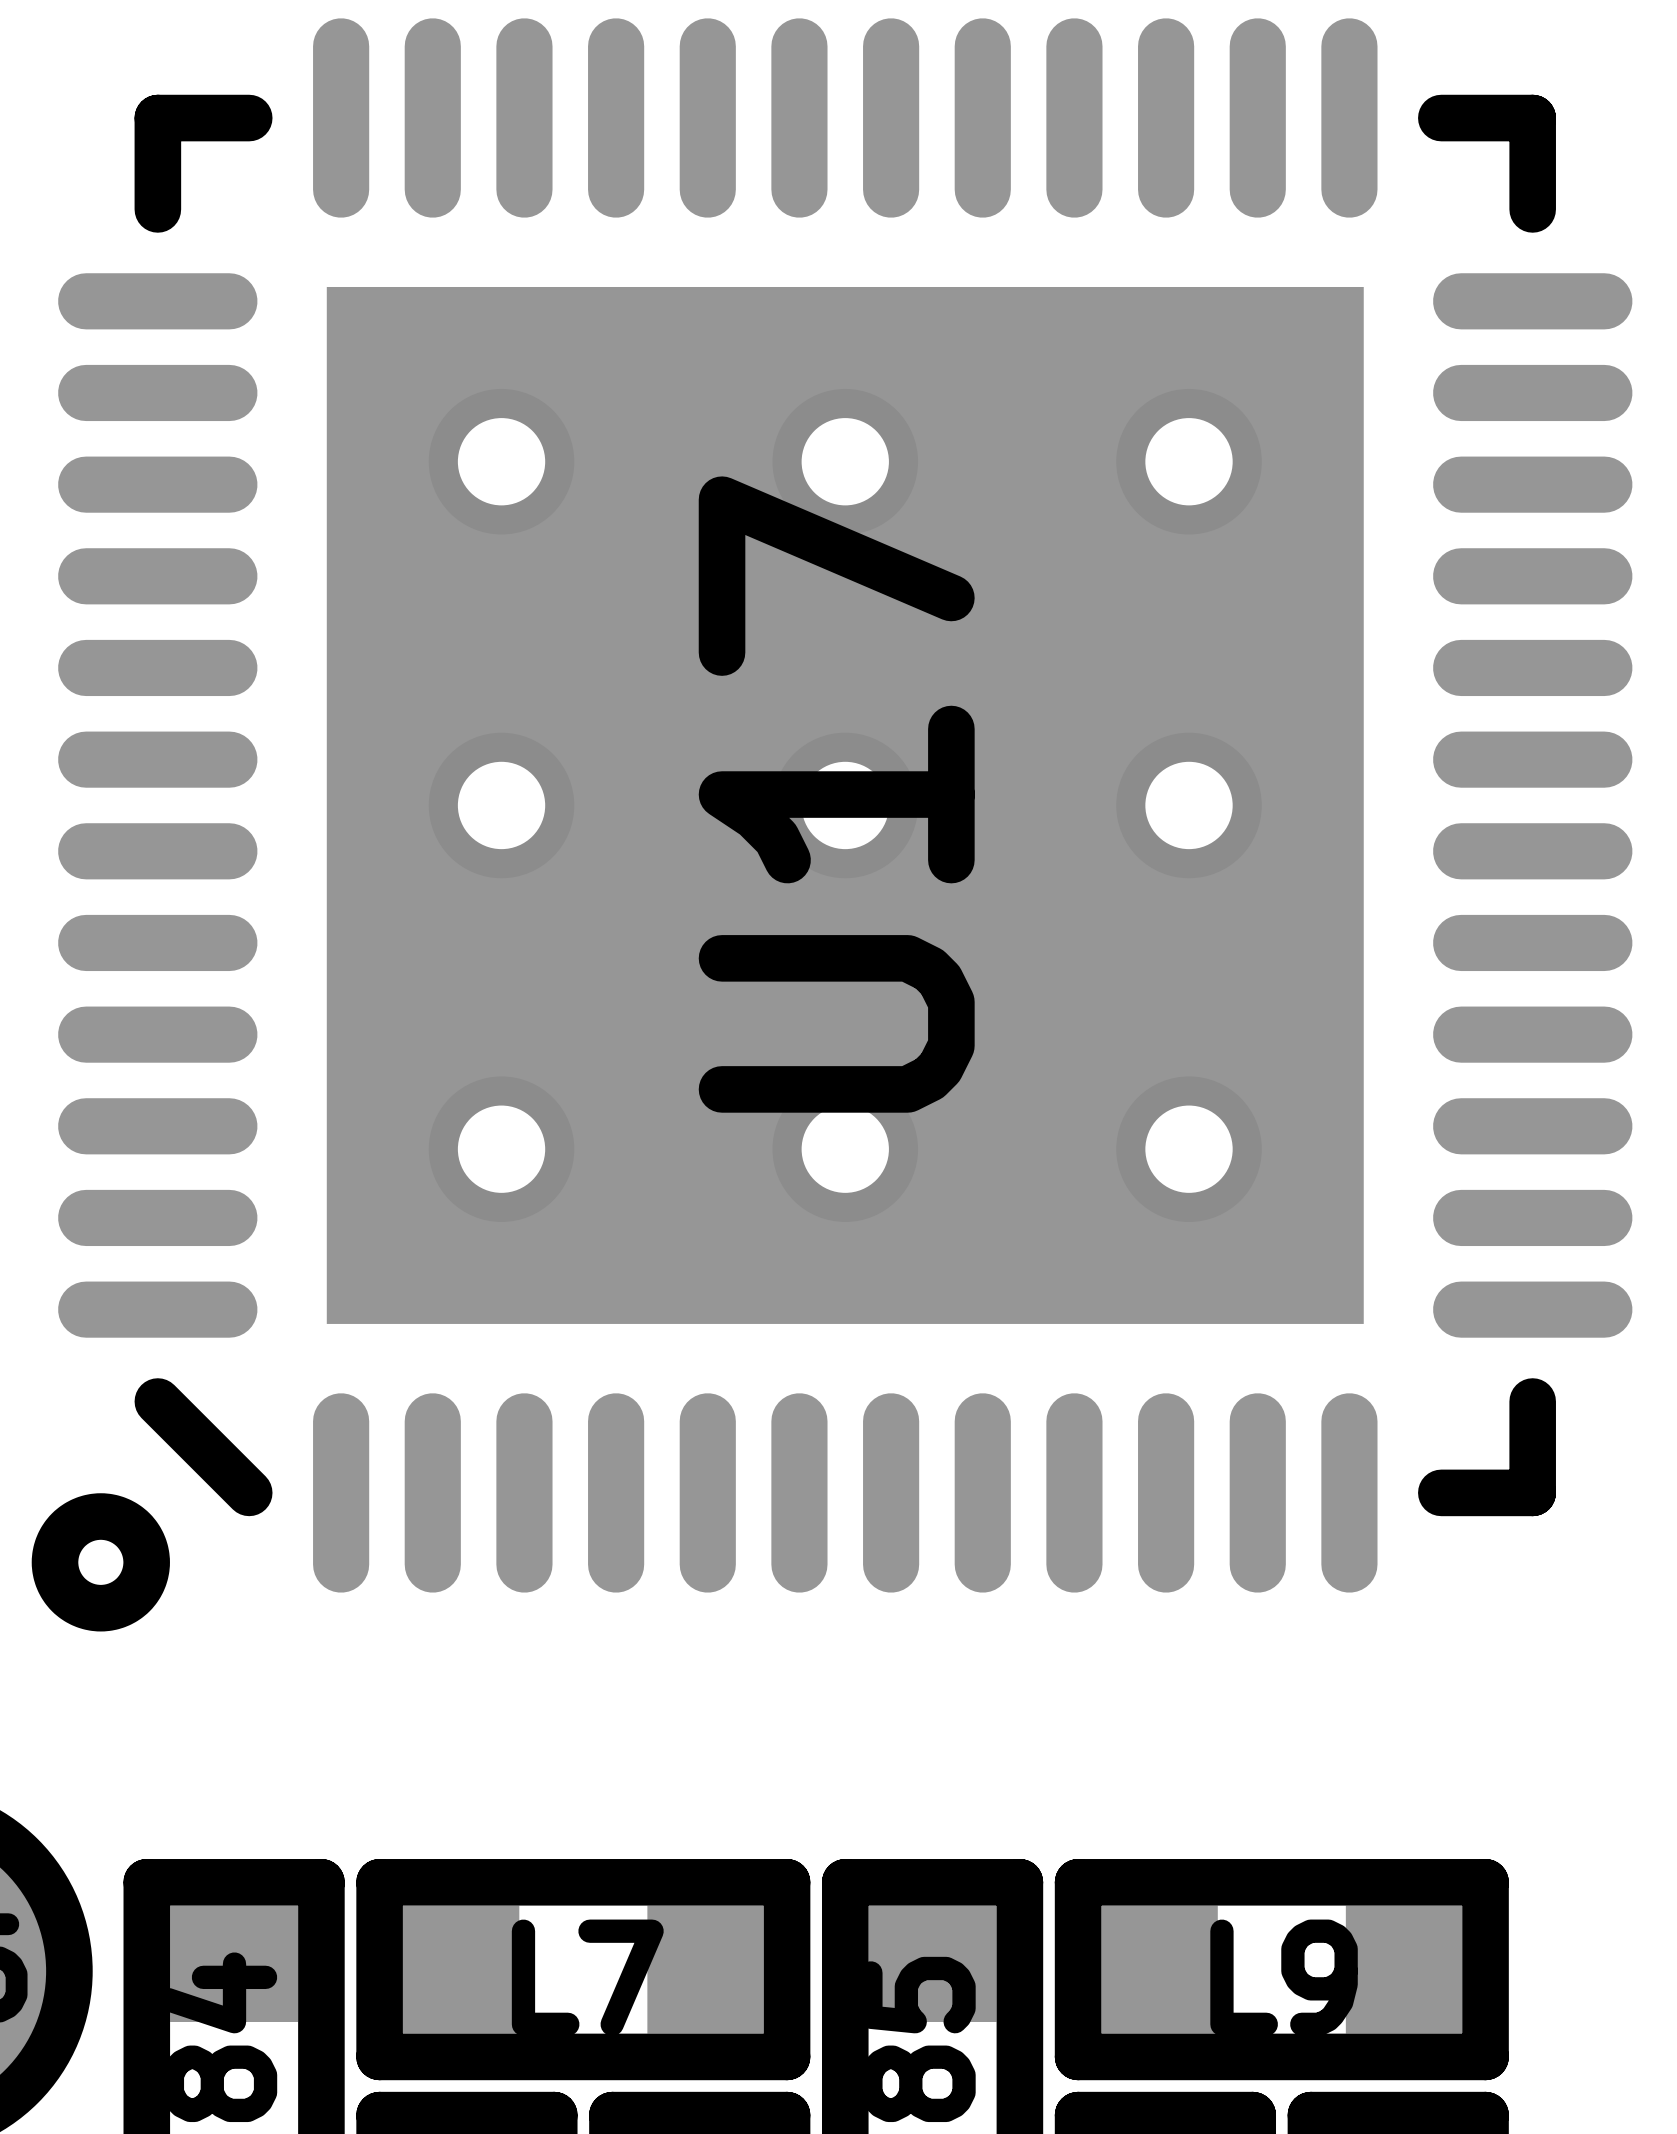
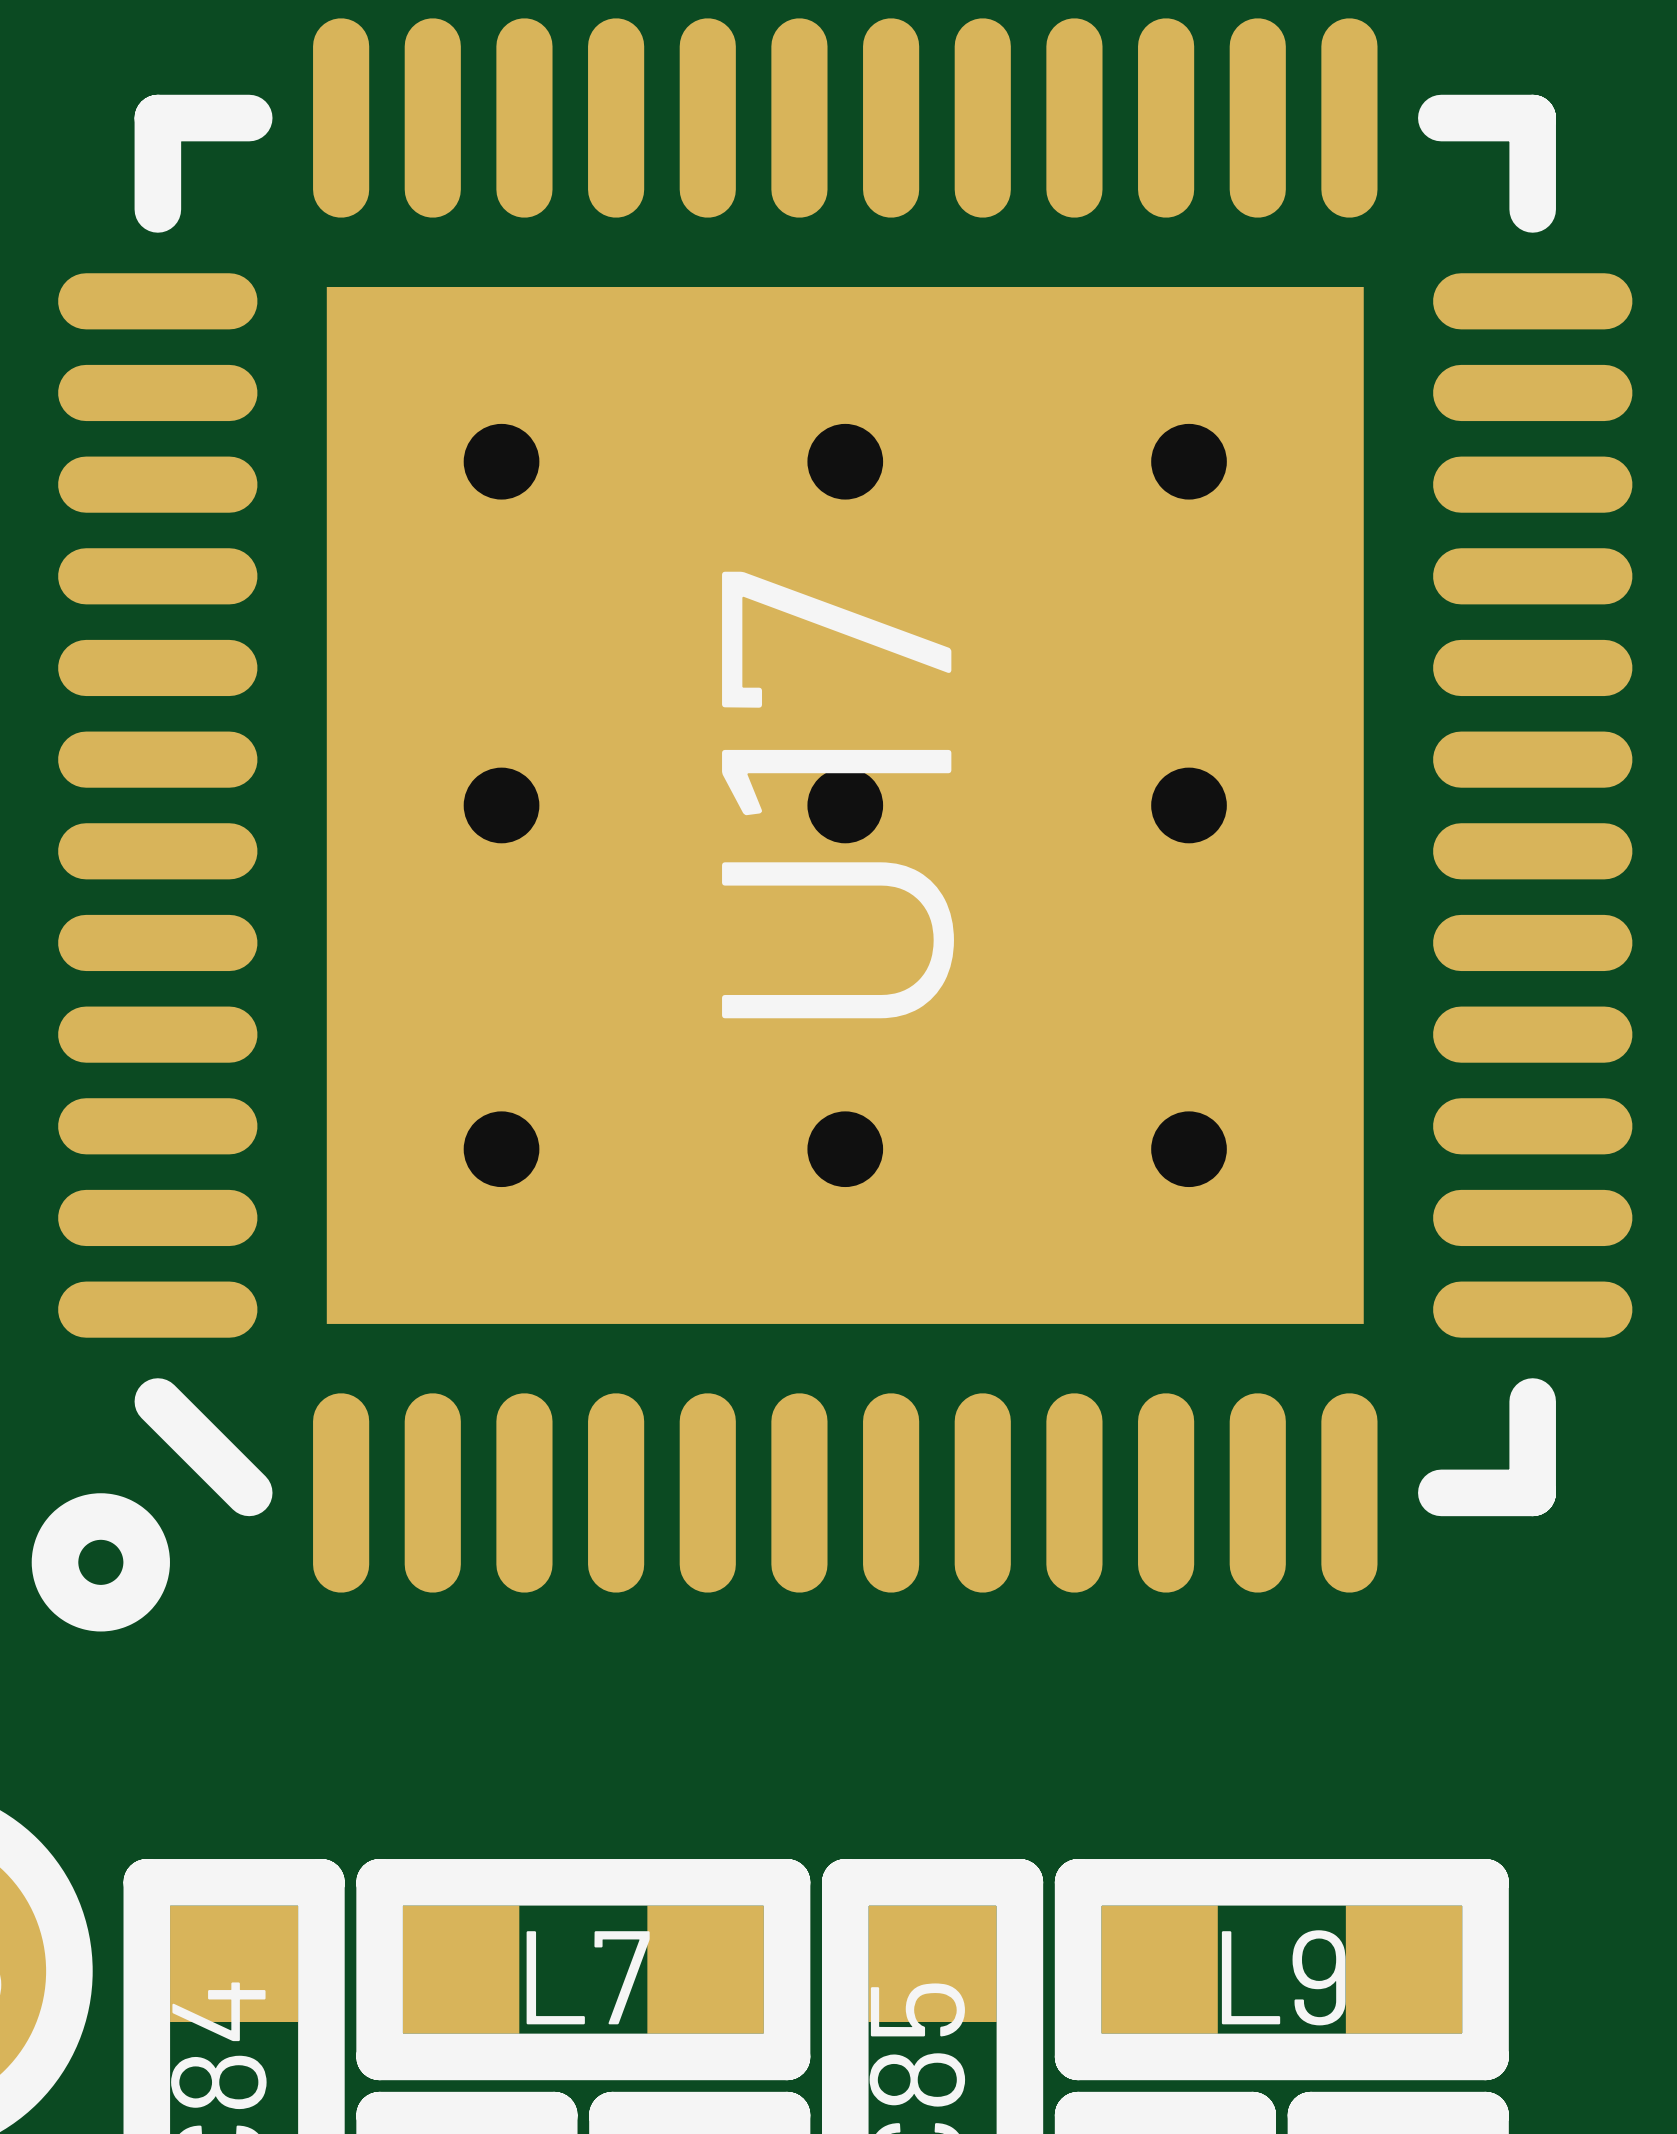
U17 footprint: [58, 18, 1633, 1593] -> [58, 18, 1633, 1593]

